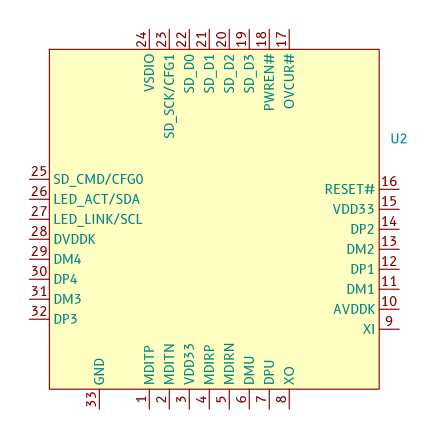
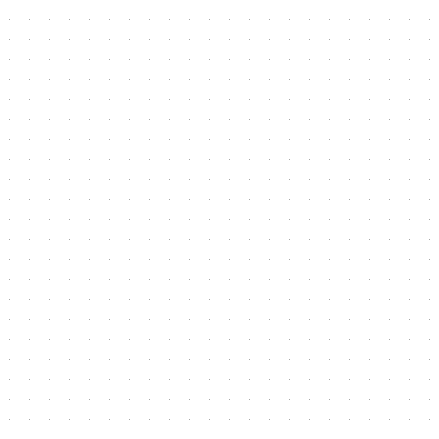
U2: (214, 219) -> none

